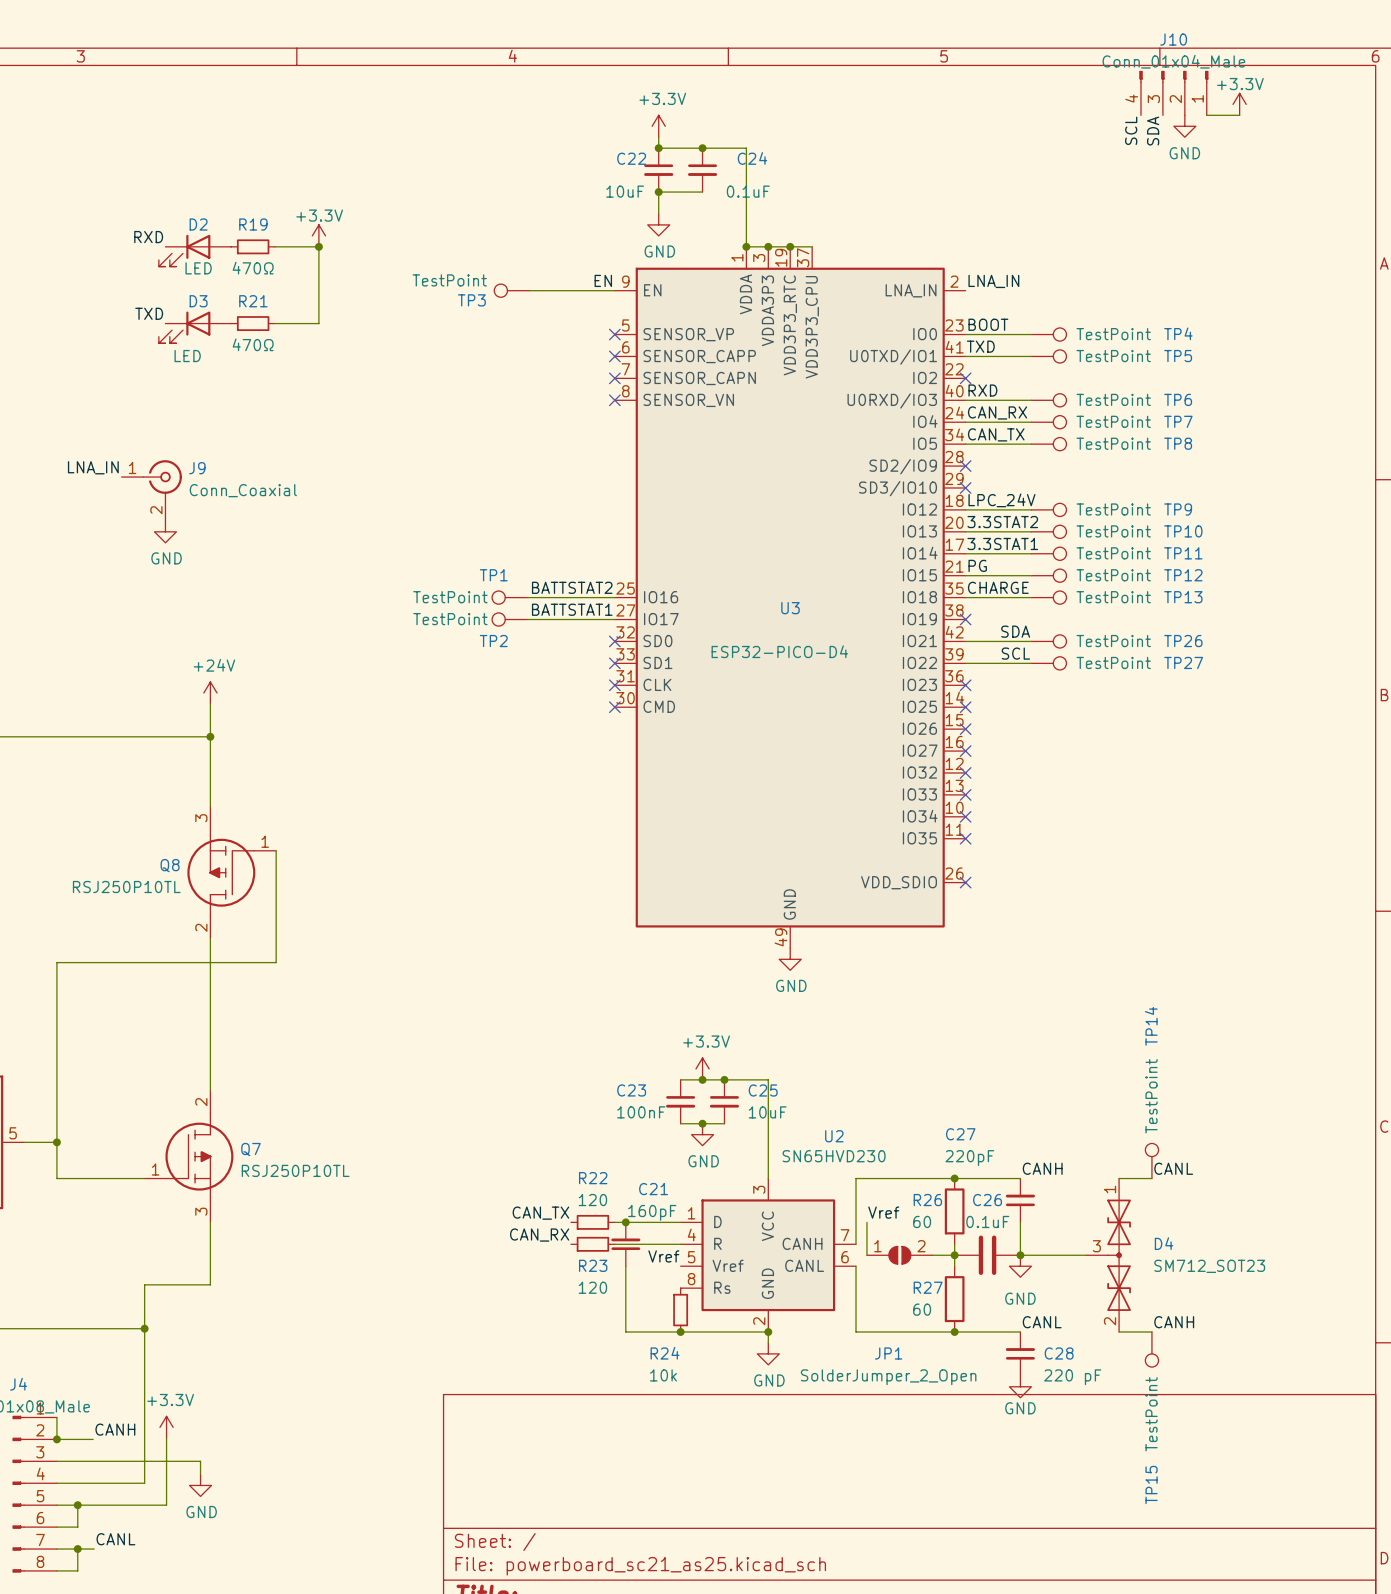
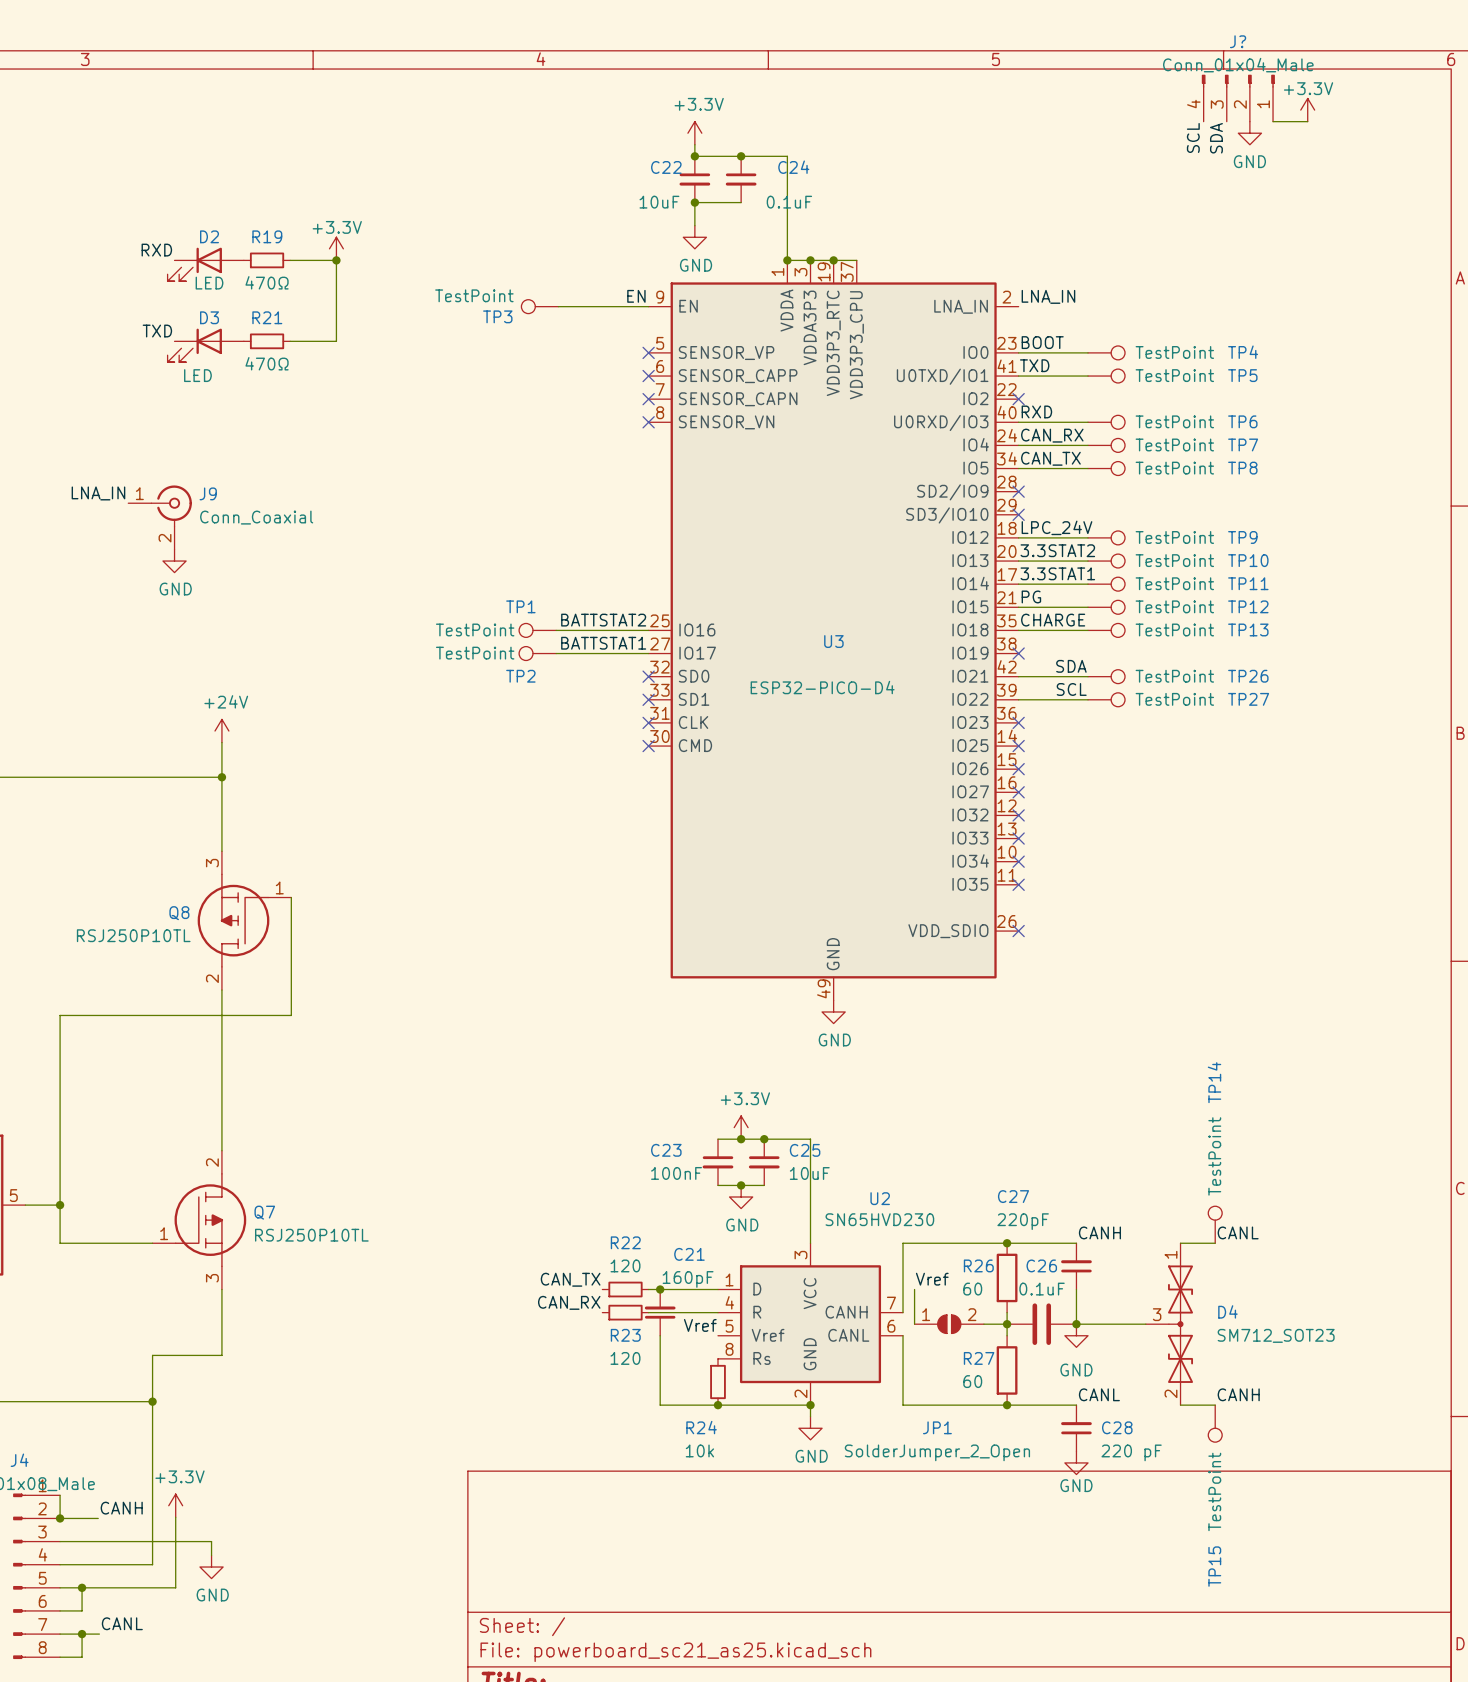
J10 name: J10 (1173, 39) -> J? (1238, 41)

